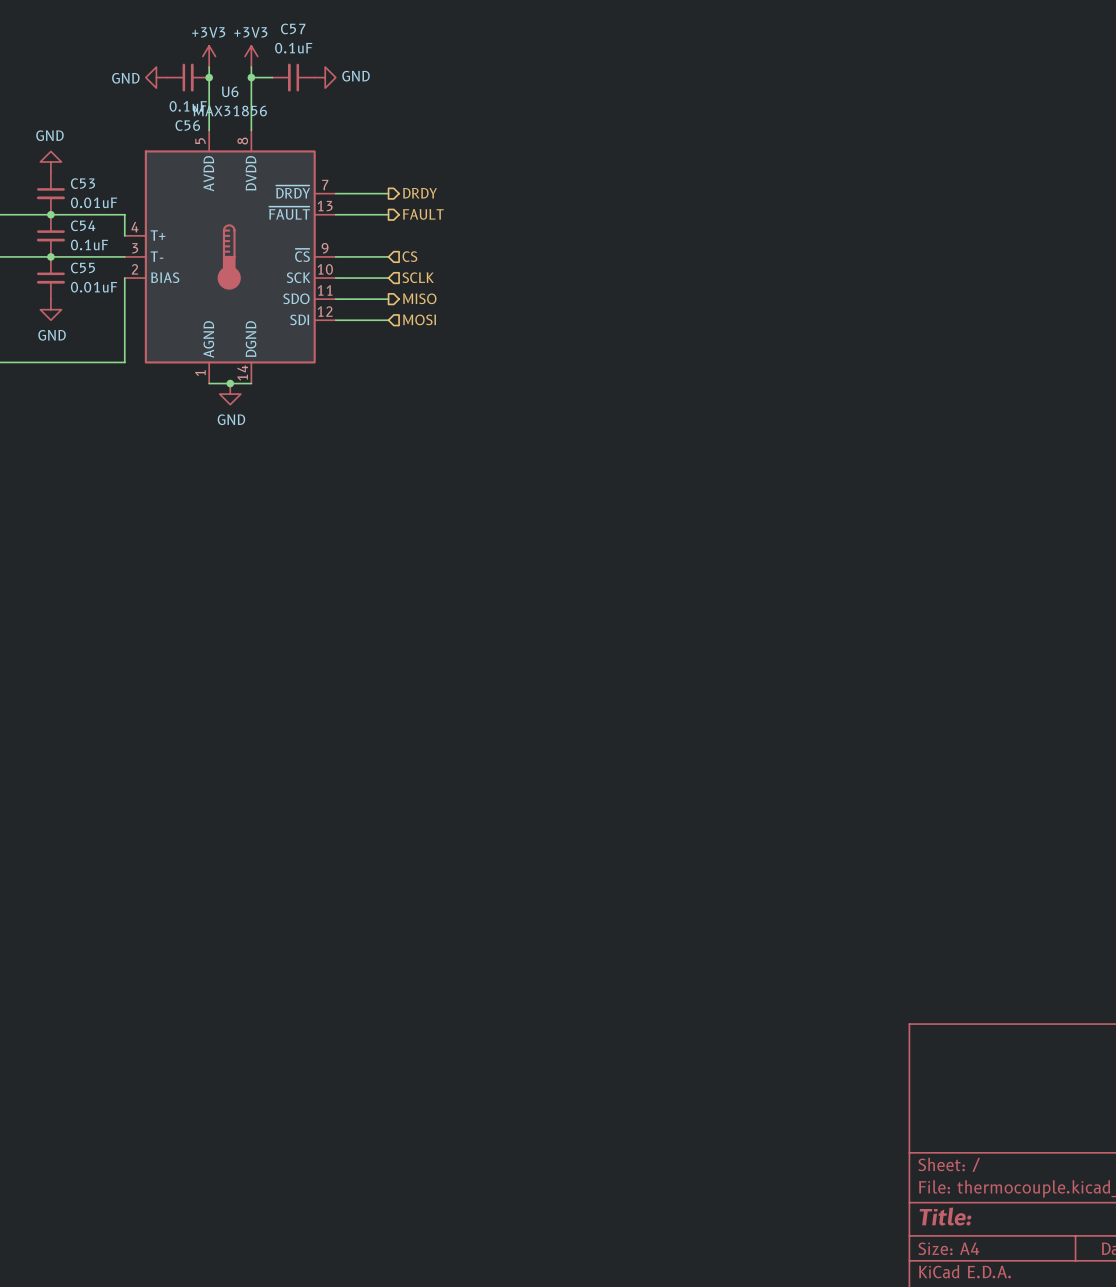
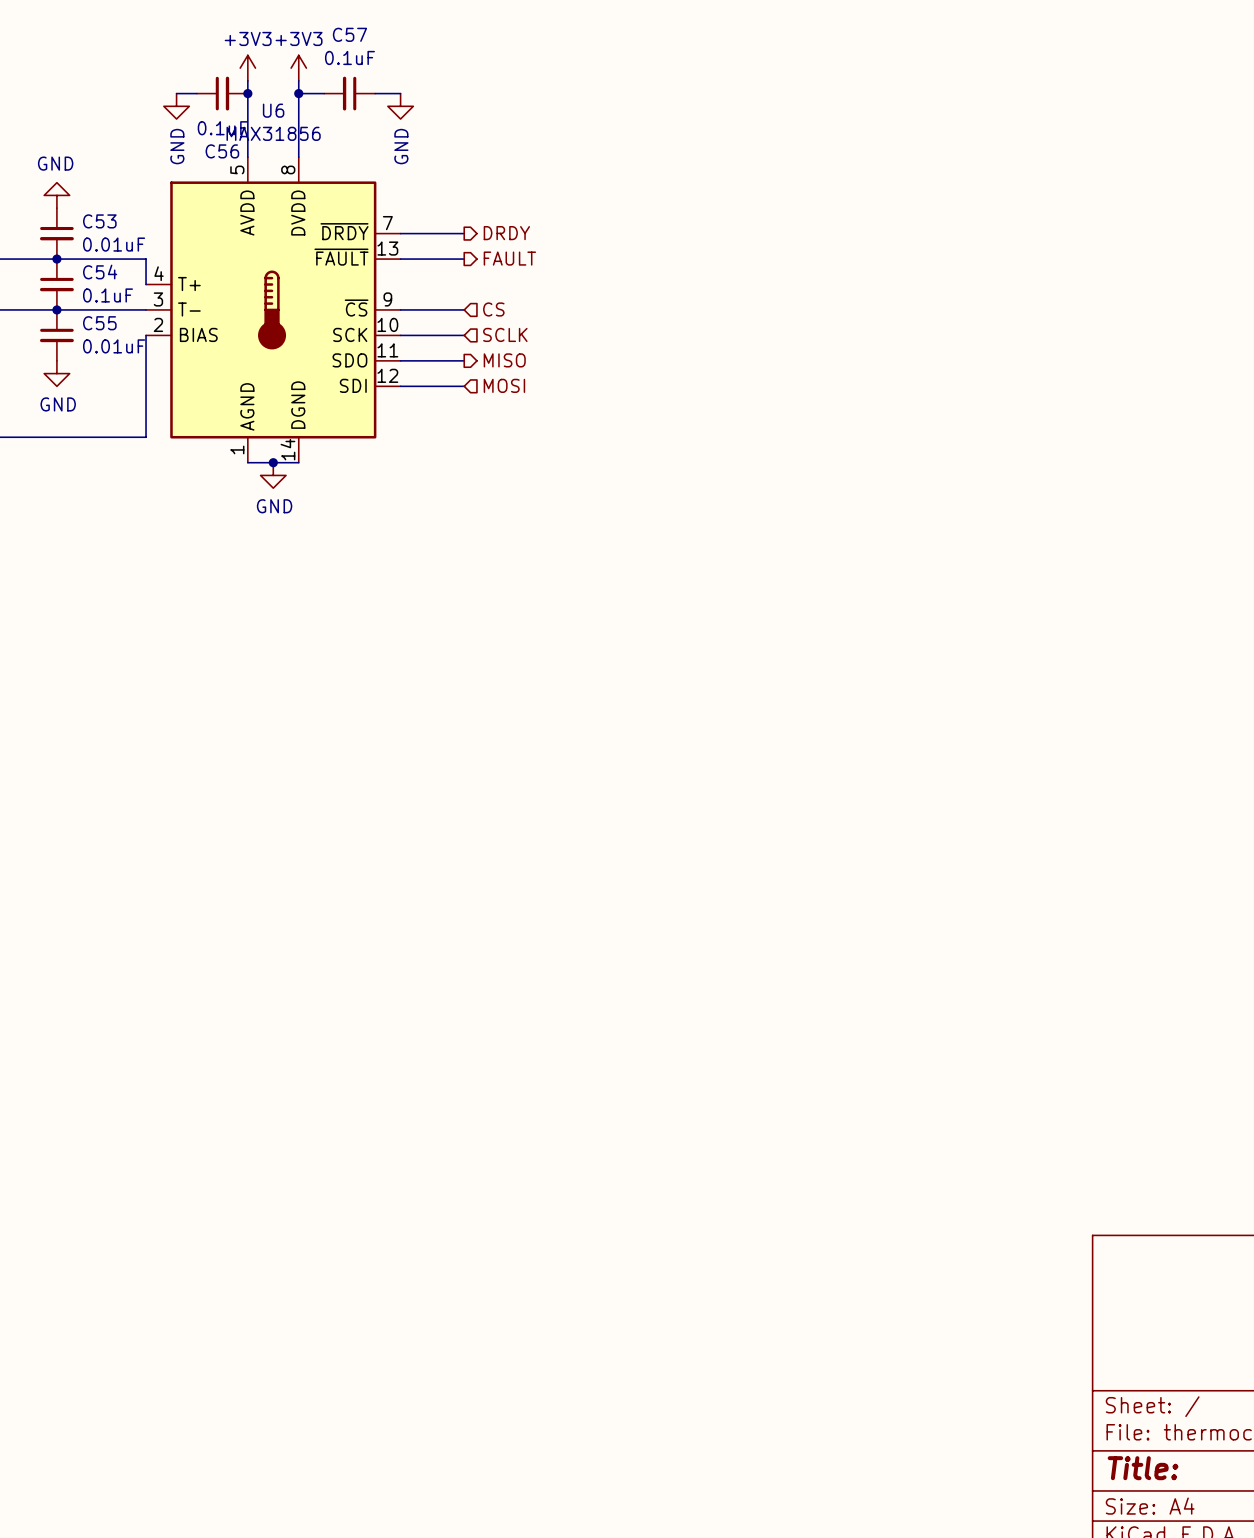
power symbol rotation: 0° (156, 77) -> 90° counterclockwise (176, 106)
power symbol rotation: 0° (325, 77) -> 90° clockwise (400, 106)
power symbol position: GND (325, 77) -> GND (400, 106)

